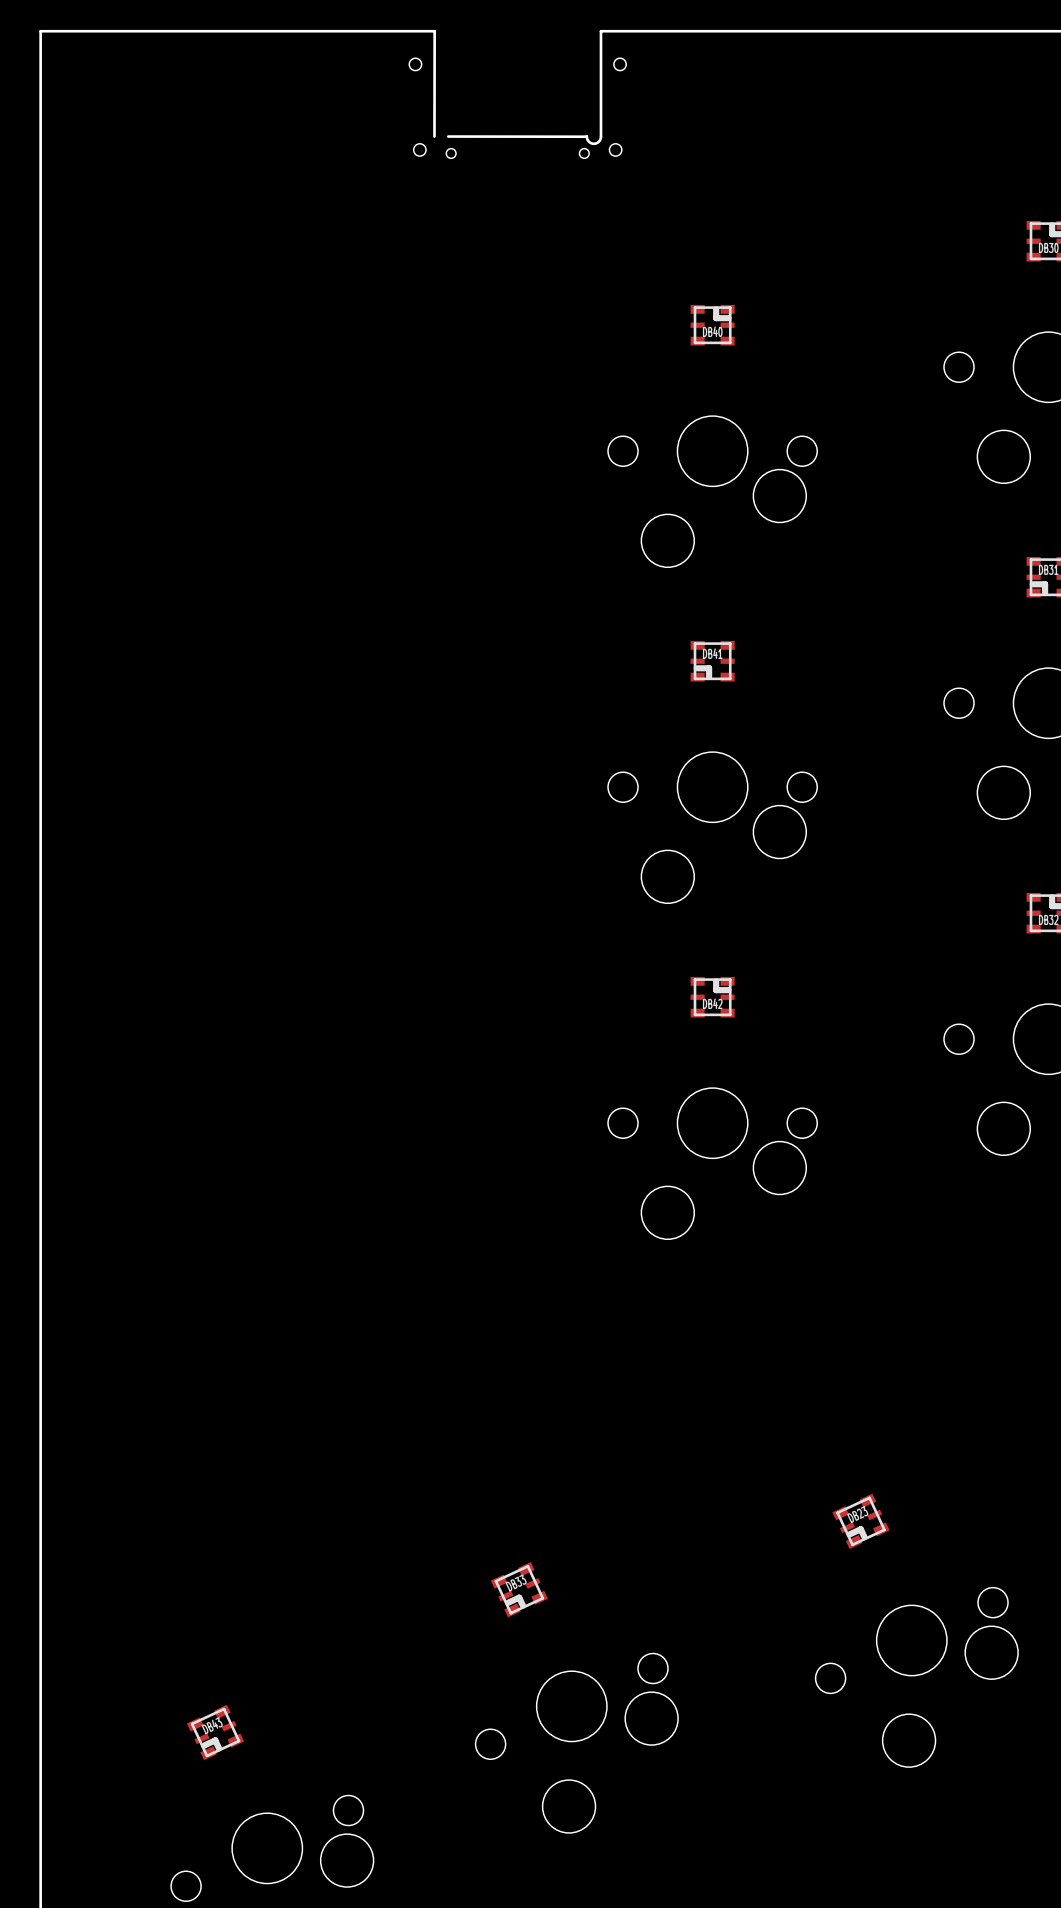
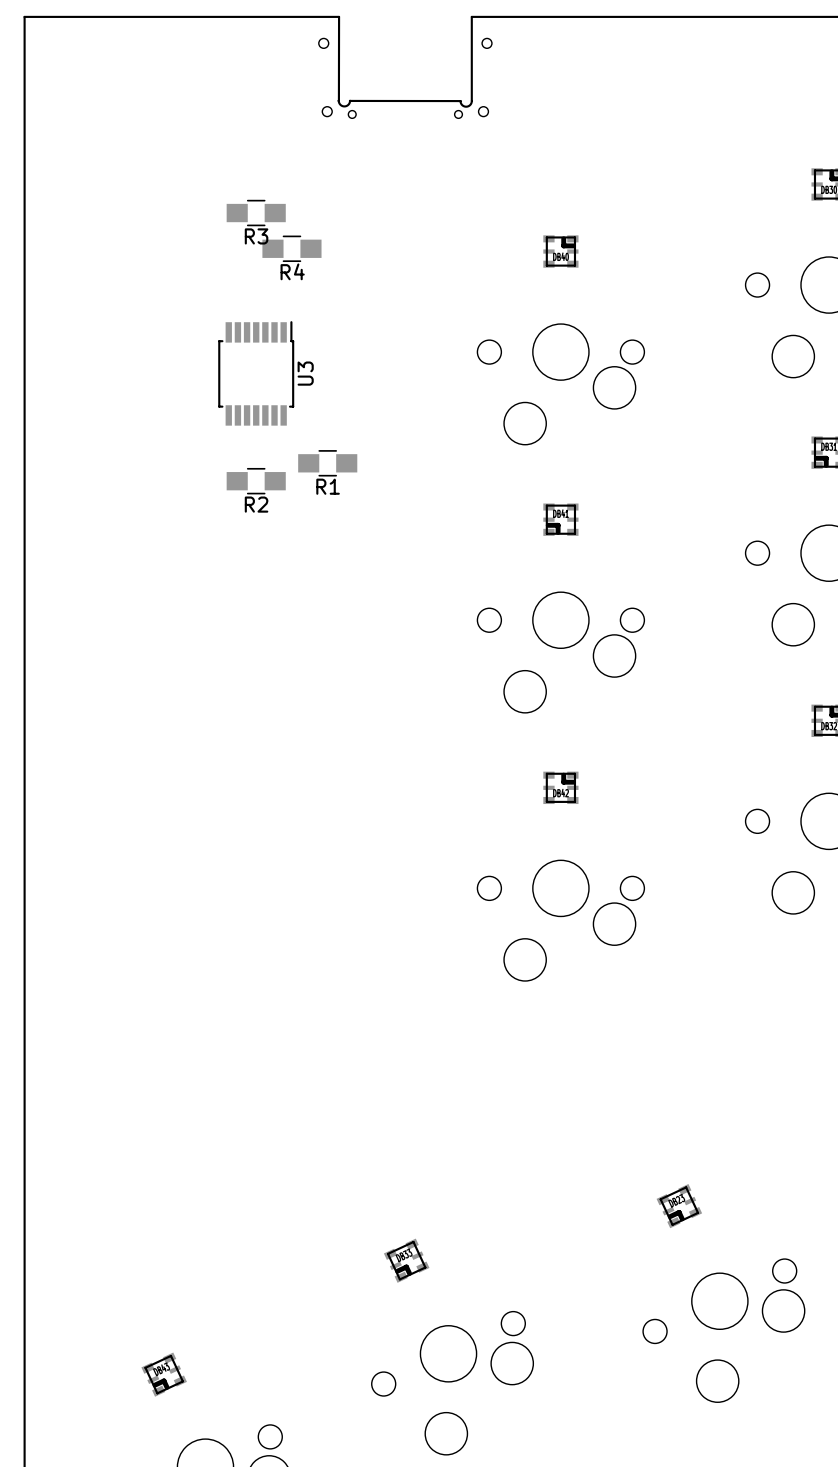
board edge: none -> (338, 100) (340, 104) (344, 106) (348, 104) (350, 100)
R3: none -> (256, 213)
R4: none -> (291, 248)
U3: none -> (256, 373)
R1: none -> (327, 463)
R2: none -> (256, 481)

